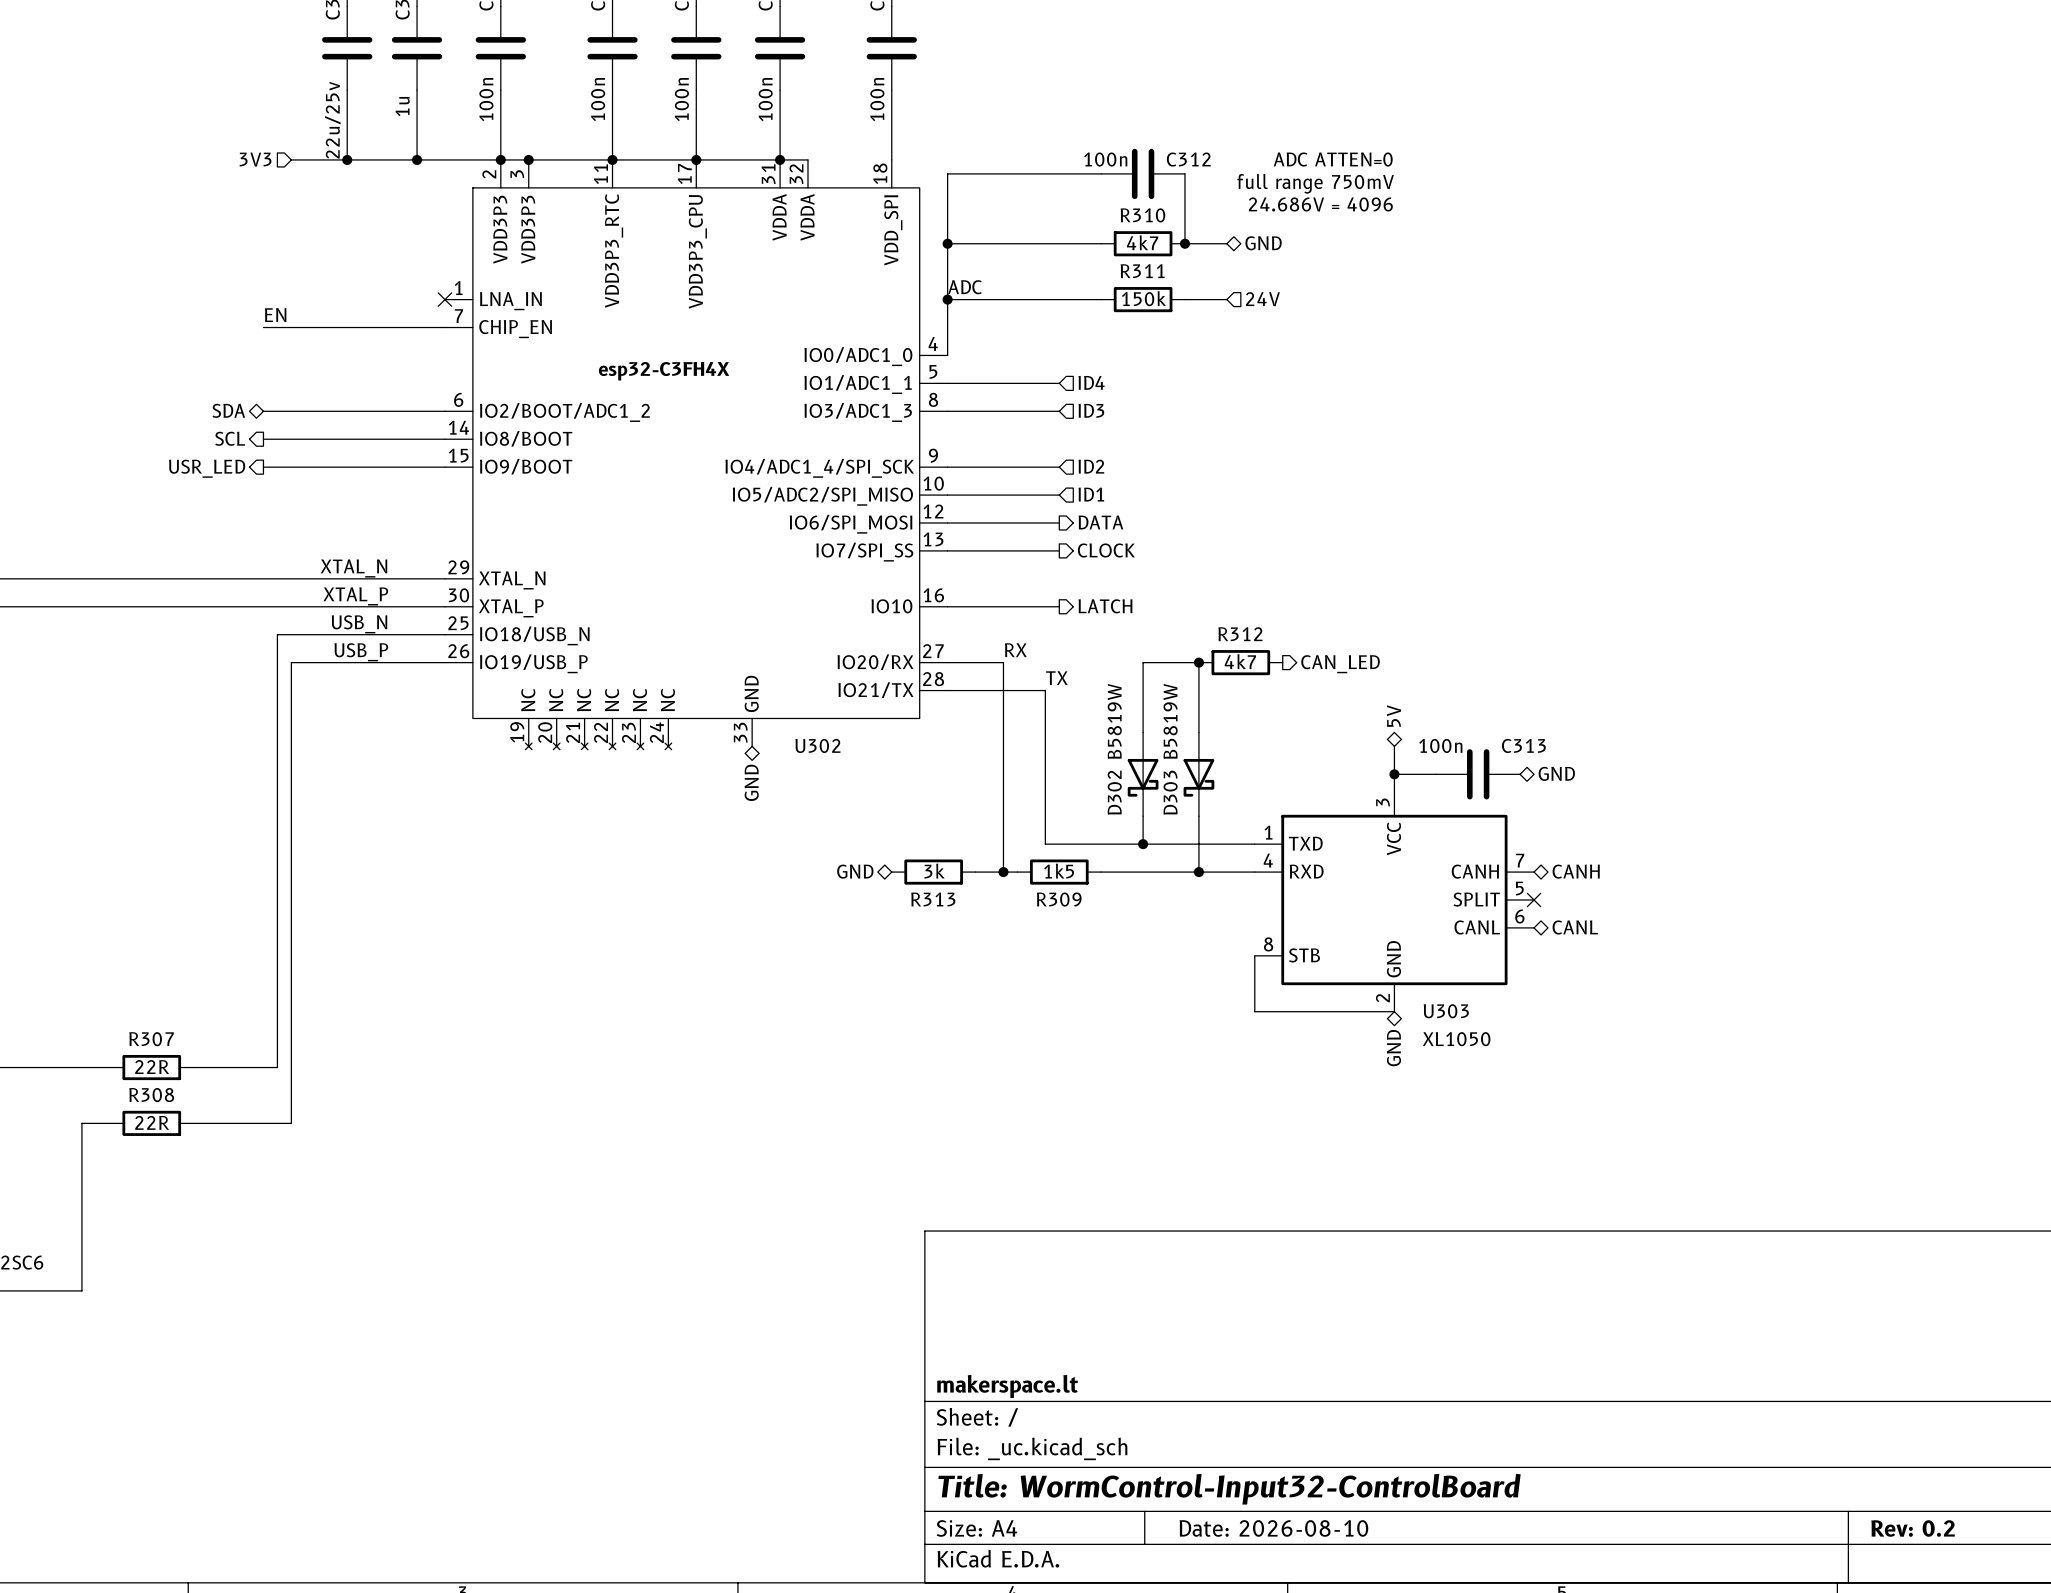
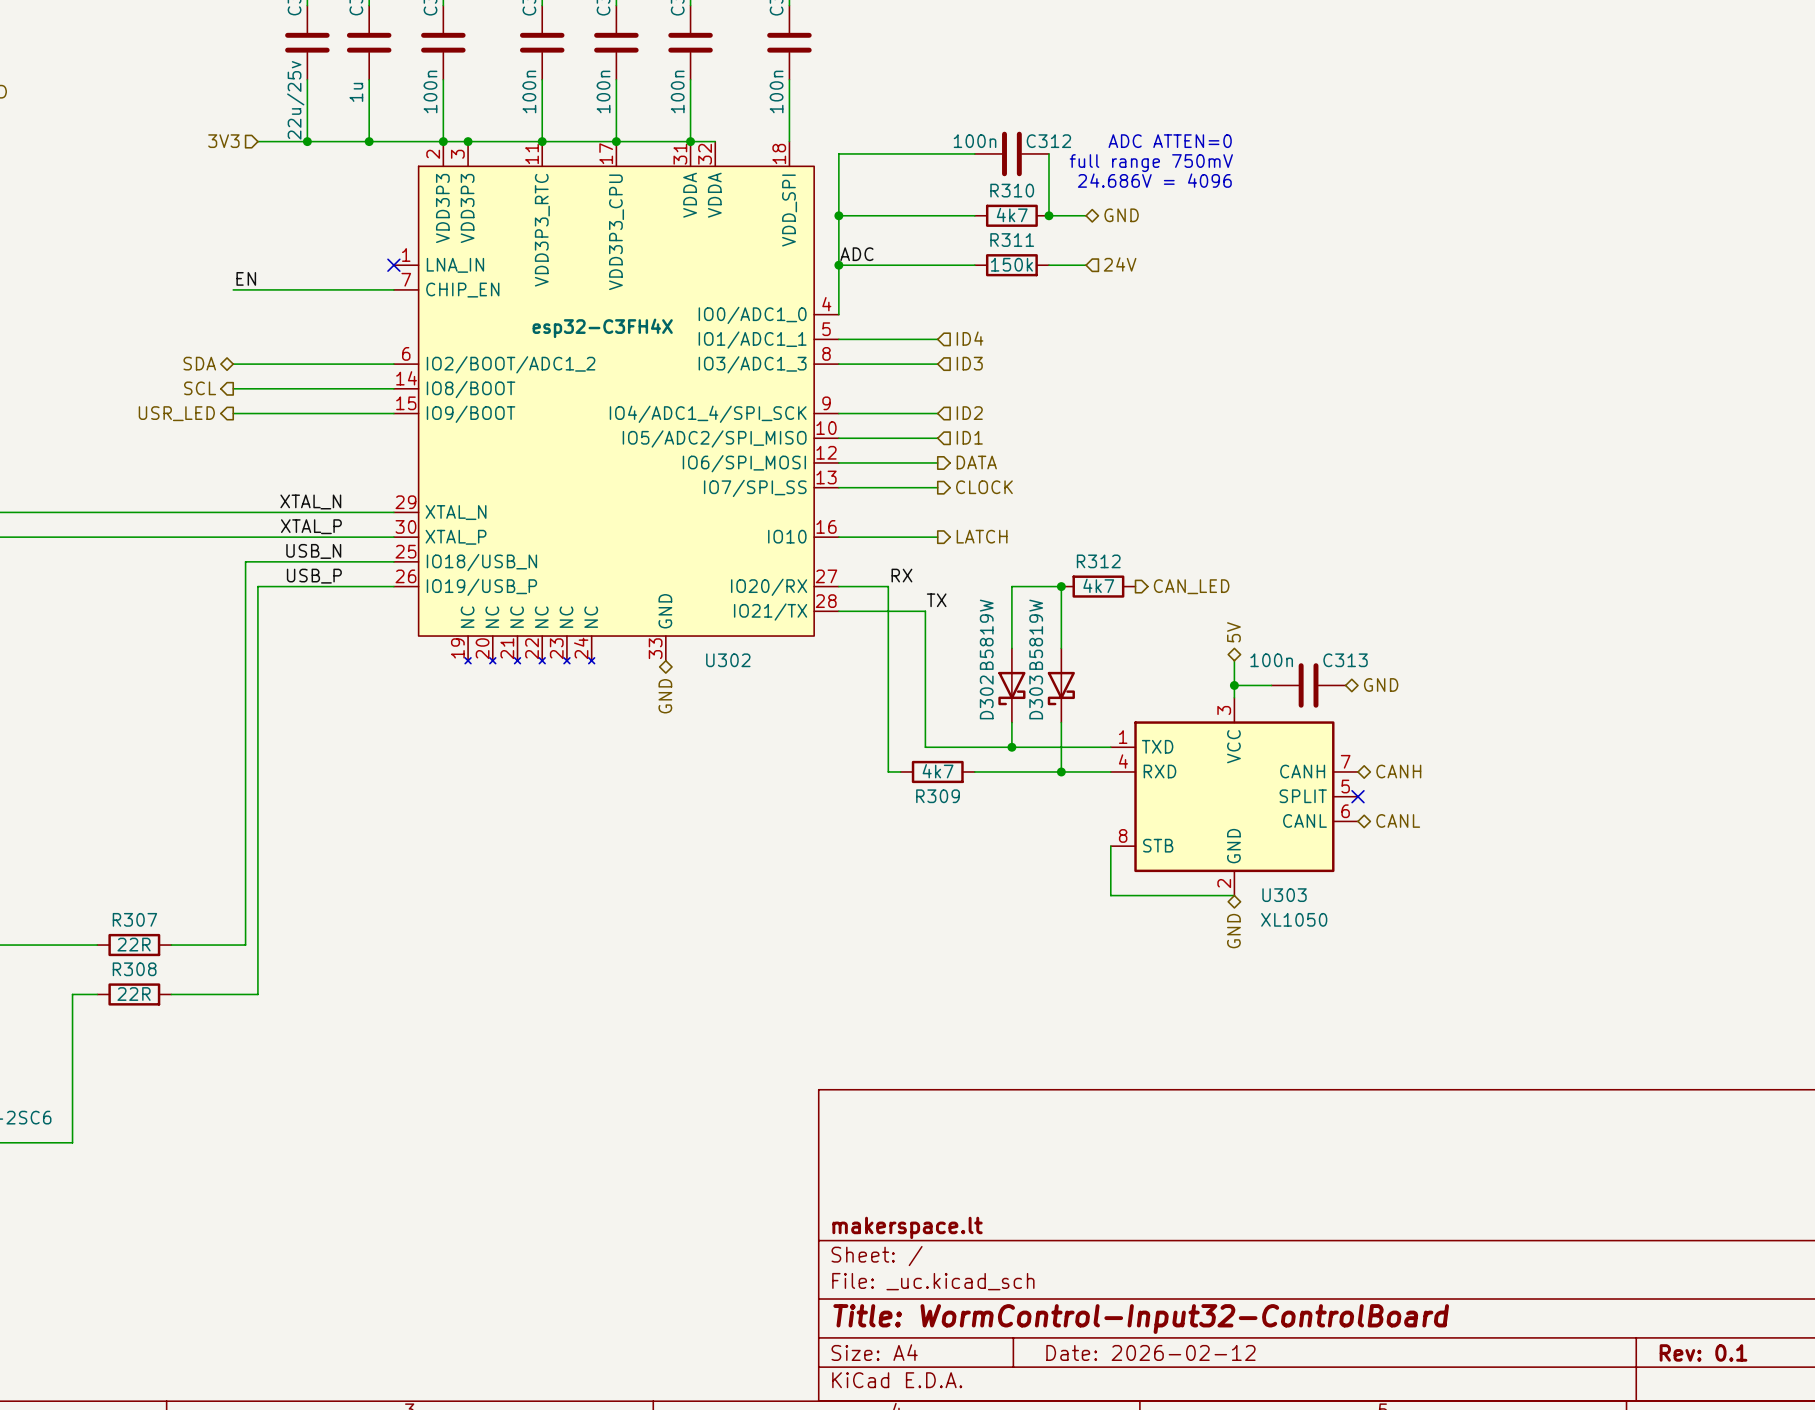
hierarchical label: GND (855, 871) -> none
R309 value: 1k5 (1059, 871) -> 4k7 (938, 771)
R313: 3k (933, 872) -> none
wire: (975, 872) (1003, 872) -> none
junction: (1003, 872) -> none
title block: Date: 2026-08-10 (1273, 1528) -> Date: 2026-02-12 (1150, 1352)
title block: Rev: 0.2 (1913, 1528) -> Rev: 0.1 (1703, 1352)

